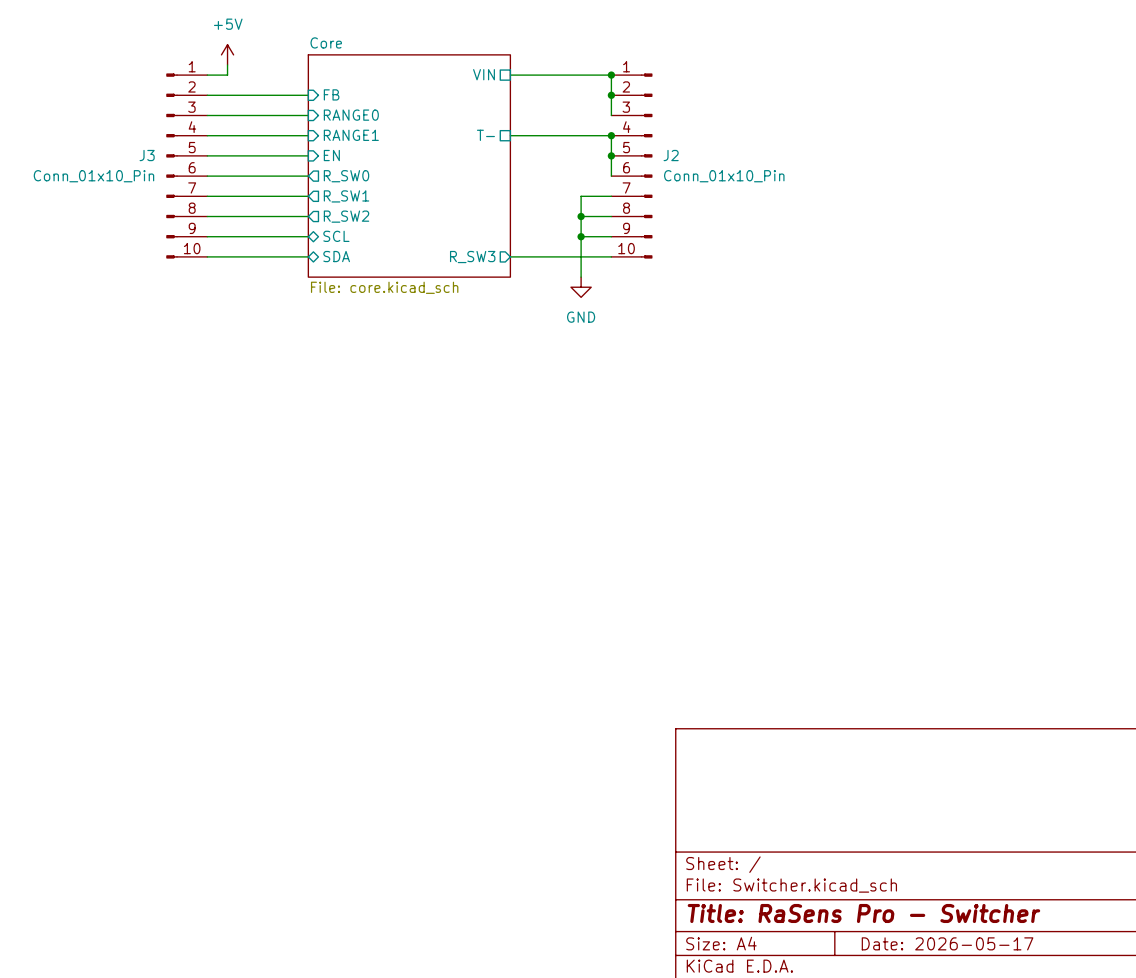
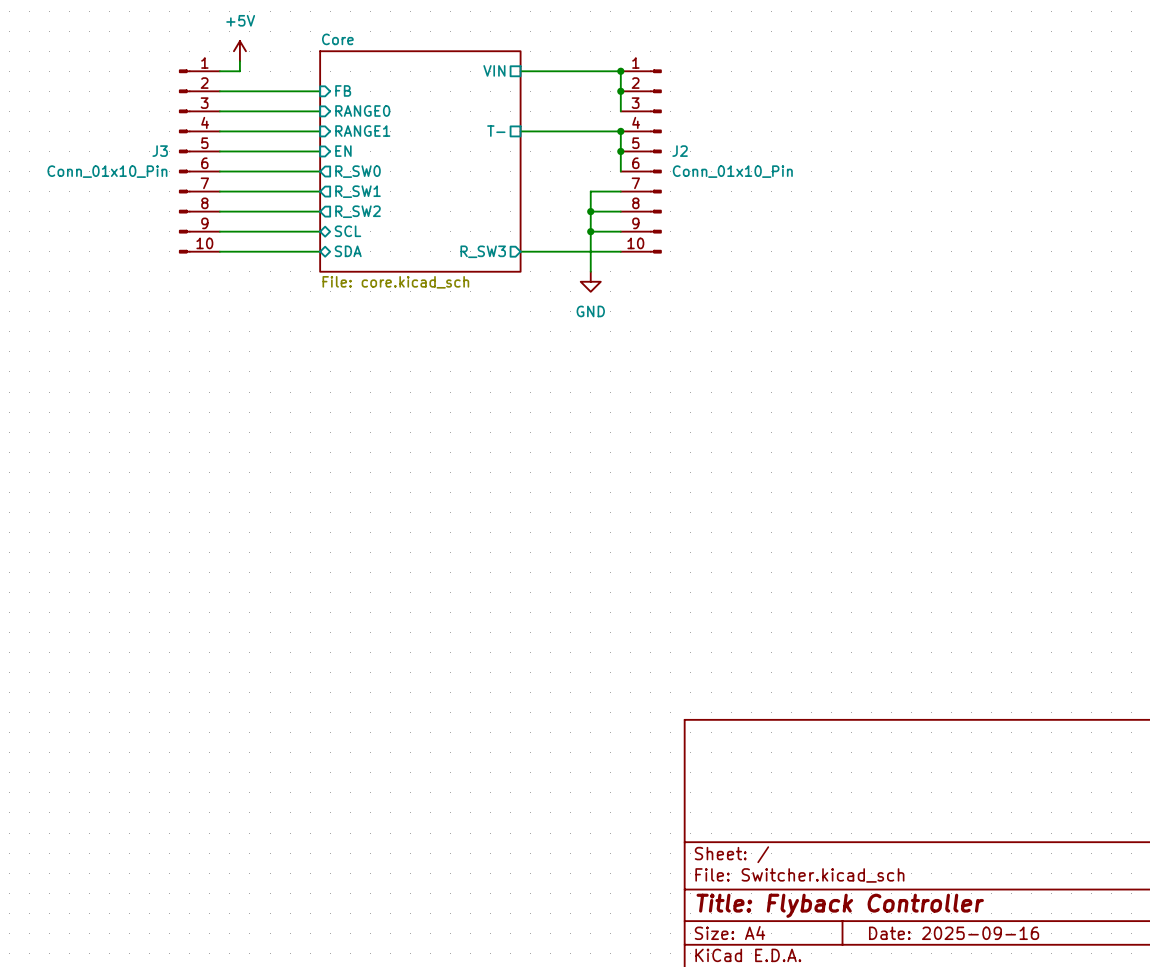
title block: Title: RaSens Pro - Switcher (863, 913) -> Title: Flyback Controller (840, 905)
title block: Date: 2026-05-17 (947, 943) -> Date: 2025-09-16 (954, 933)

